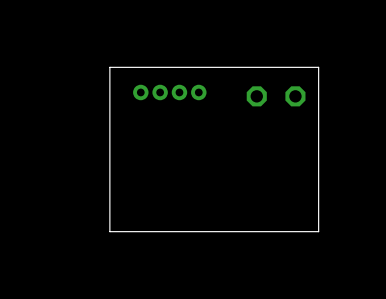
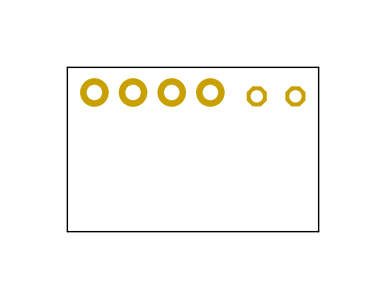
board edge: (109, 67) (109, 231) -> (109, 67) (67, 67) (67, 231) (109, 231)
part: none -> (152, 92)
part: (169, 92) -> none

